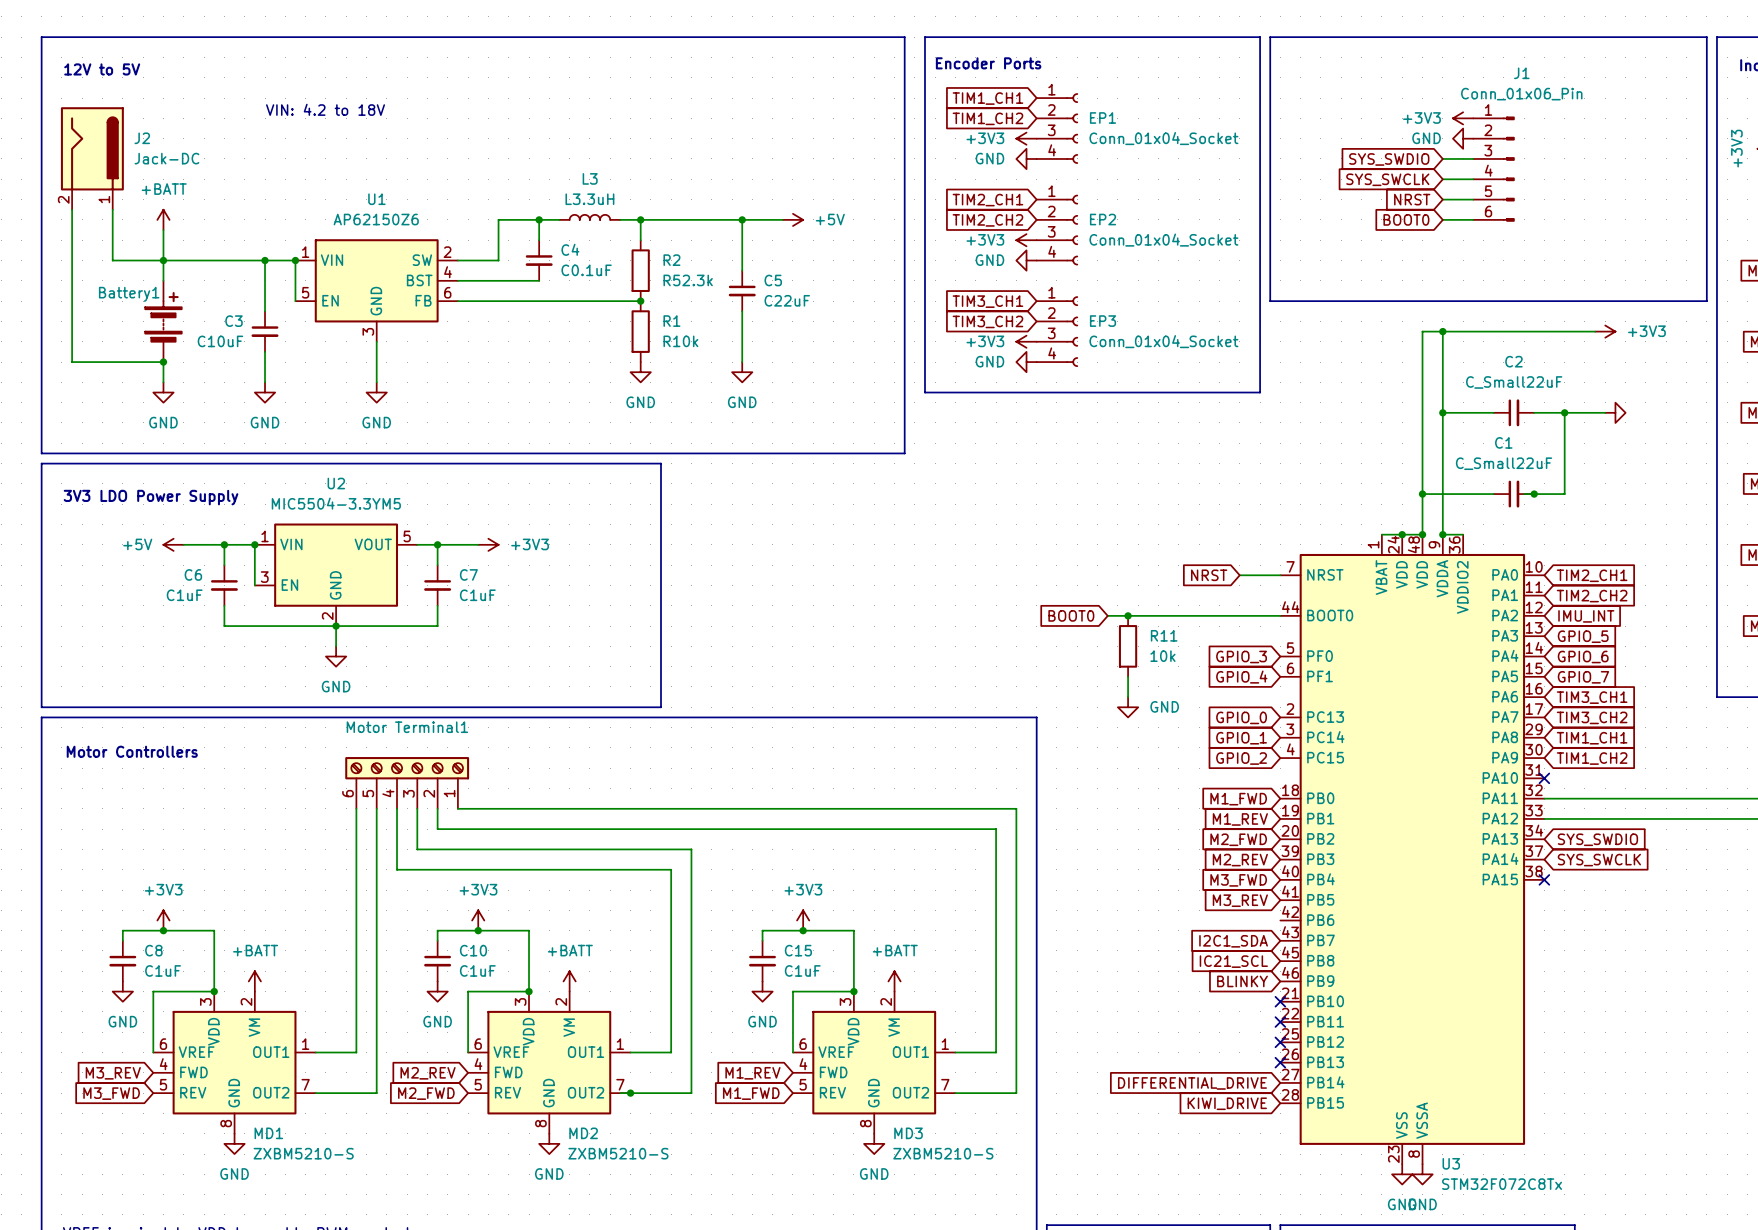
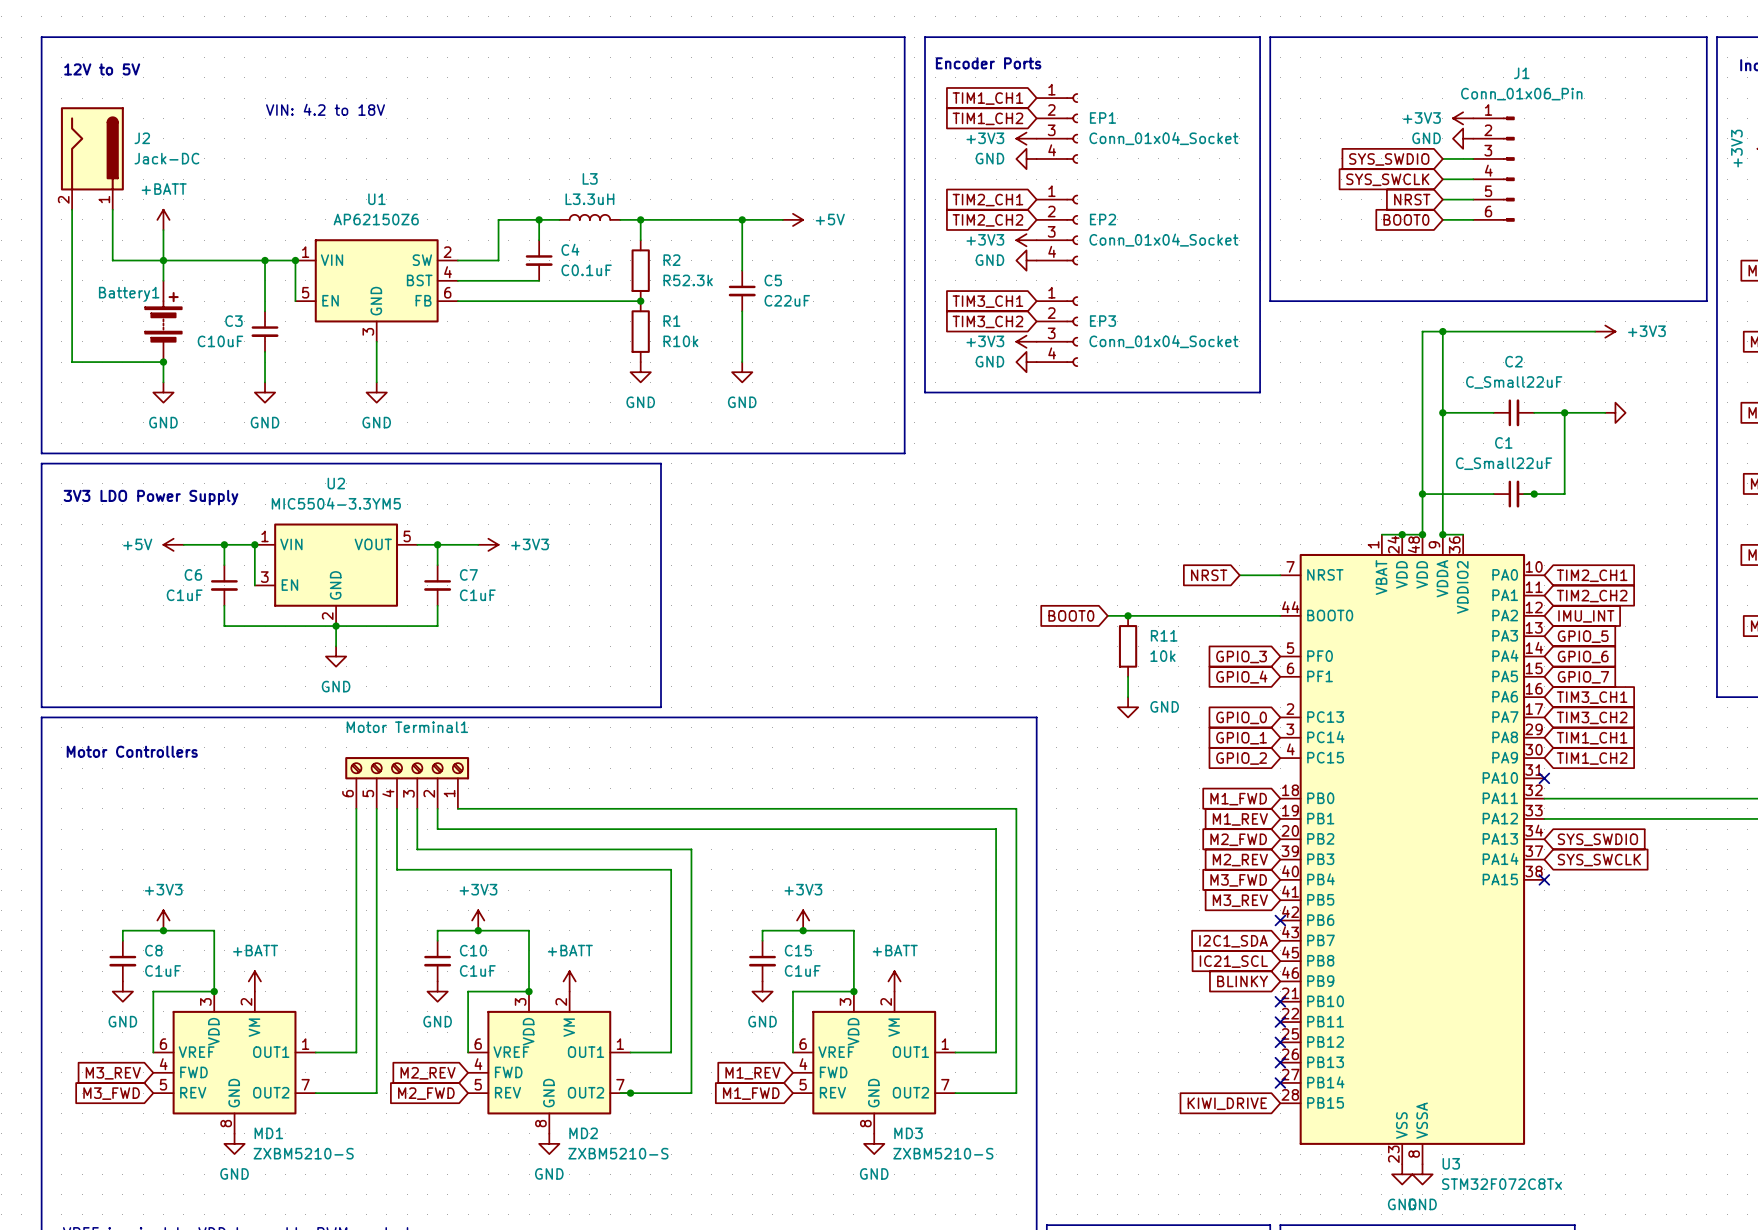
no-connect mark: none -> (1280, 920)
no-connect mark: none -> (1280, 1082)
global label: DIFFERENTIAL_DRIVE (1192, 1083) -> none

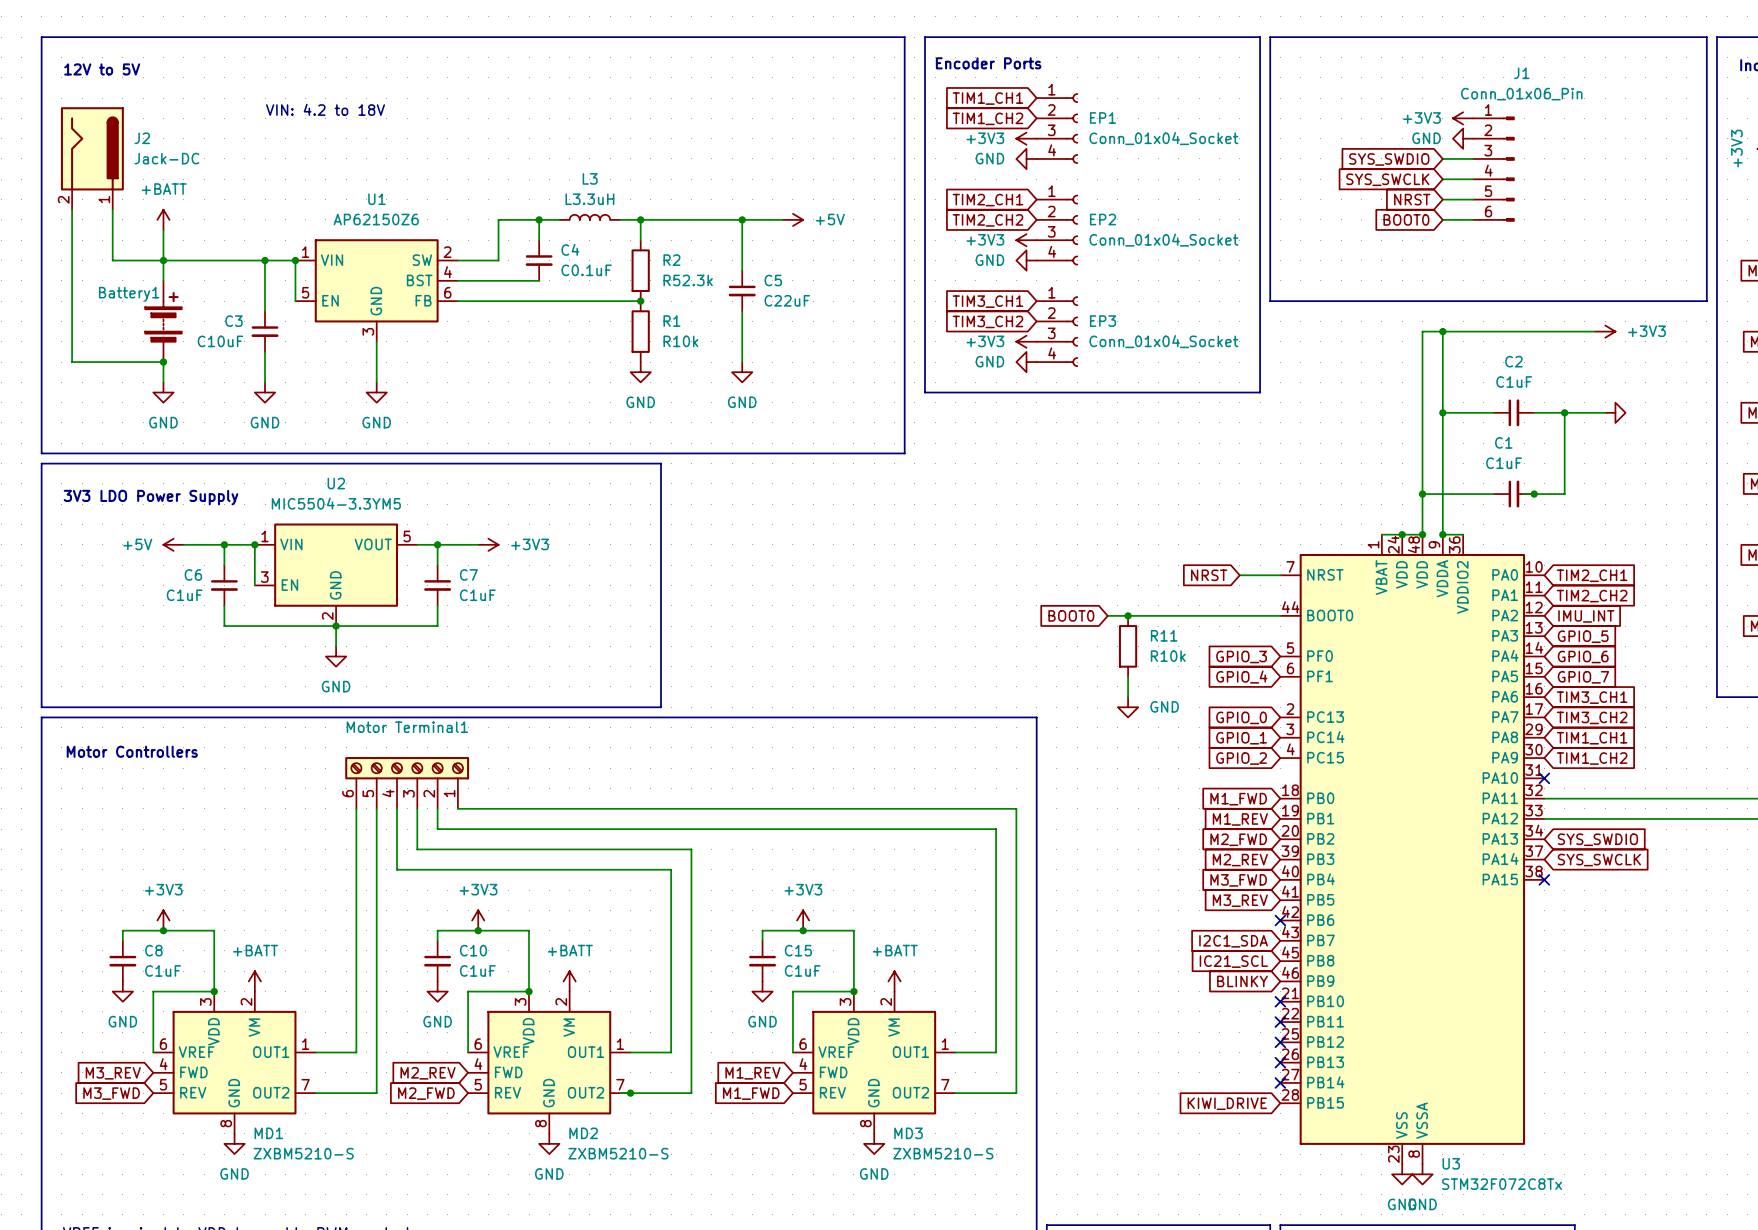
C2 value: C_Small22uF (1514, 382) -> C1uF (1514, 381)
C1 value: C_Small22uF (1504, 463) -> C1uF (1504, 463)
R11 value: 10k (1162, 656) -> R10k (1168, 656)

